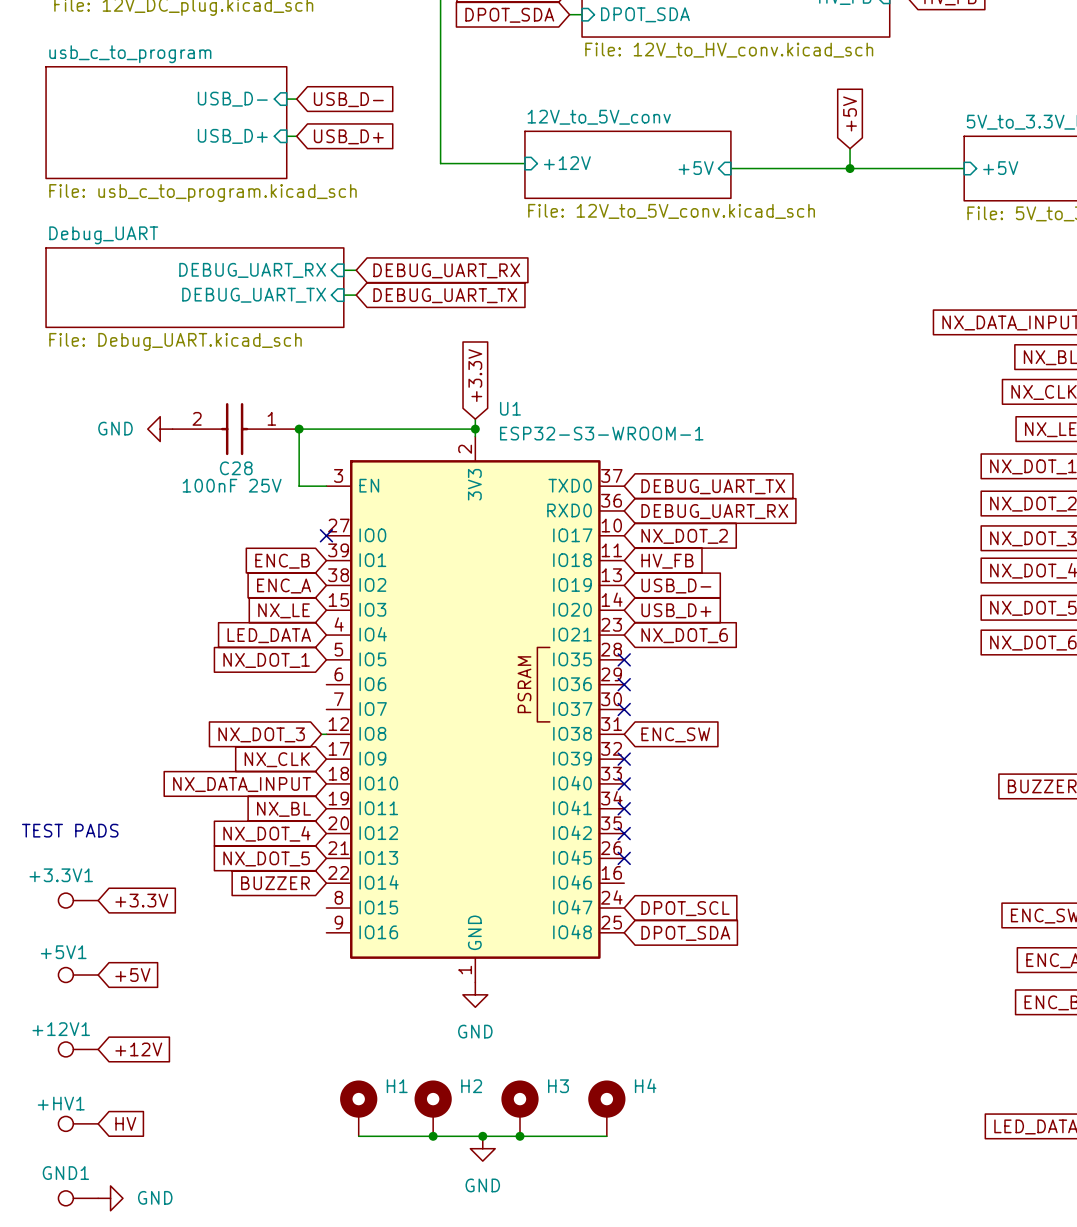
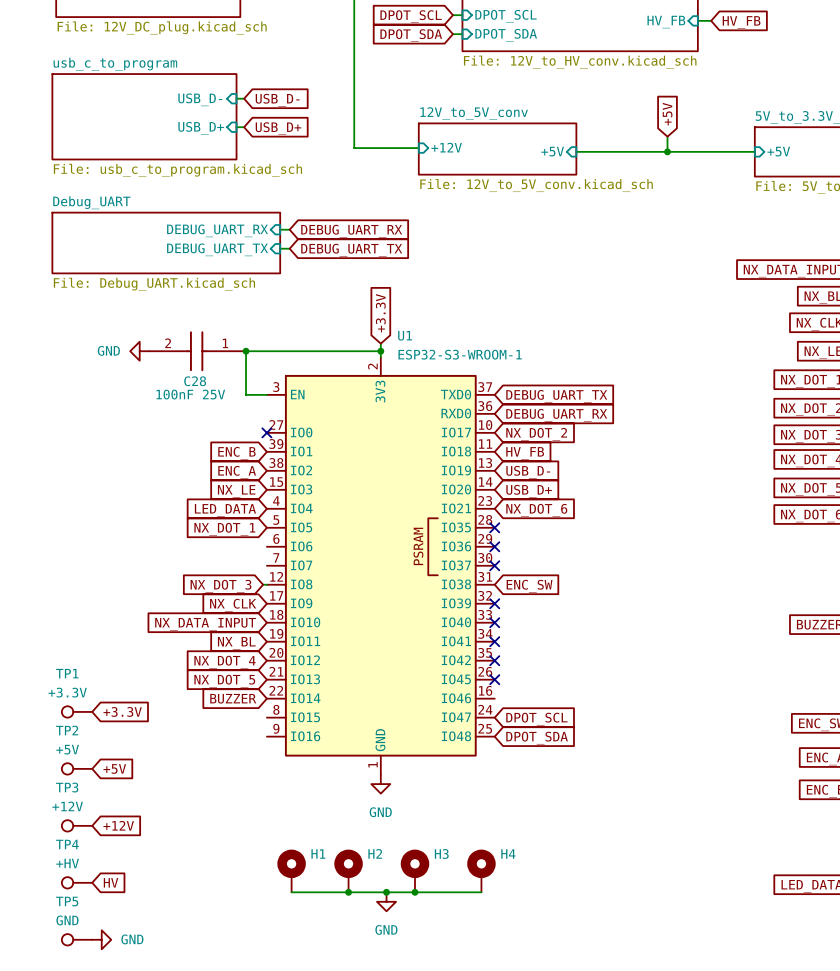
text: TEST PADS (70, 830) -> none
+3.3V1 name: +3.3V1 (61, 875) -> TP1 (67, 673)
+3.3V1 value: none -> +3.3V (67, 692)
+5V1 value: none -> +5V (67, 749)
+5V1 name: +5V1 (63, 952) -> TP2 (67, 730)
+12V1 value: none -> +12V (67, 806)
+12V1 name: +12V1 (61, 1029) -> TP3 (67, 787)
+HV1 value: none -> +HV (67, 863)
+HV1 name: +HV1 (61, 1103) -> TP4 (67, 844)
GND1 name: GND1 (65, 1173) -> TP5 (67, 901)
GND1 value: none -> GND (67, 920)

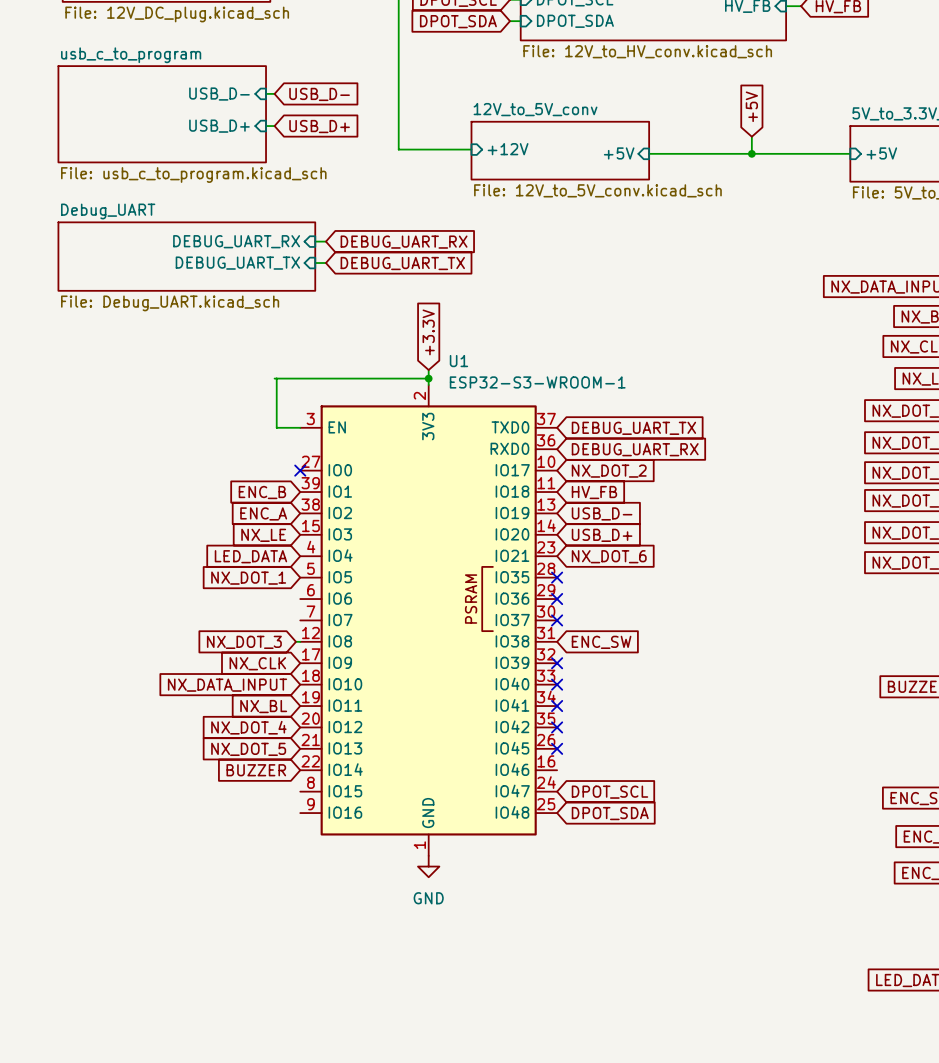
power symbol: GND (139, 351) -> none
C28: 100nF 25V (196, 351) -> none
junction: (246, 351) -> none
TP1: +3.3V (77, 711) -> none
global label: +3.3V (122, 711) -> none
TP2: +5V (77, 768) -> none
global label: +5V (114, 769) -> none
TP3: +12V (77, 825) -> none
global label: +12V (118, 825) -> none
H1: (291, 870) -> none
H2: (348, 870) -> none
H3: (414, 870) -> none
H4: (481, 870) -> none
TP4: +HV (77, 882) -> none
global label: HV (111, 882) -> none
wire: (291, 892) (481, 892) -> none
junction: (348, 892) -> none
junction: (386, 892) -> none
junction: (414, 892) -> none
power symbol: GND (386, 901) -> none
TP5: GND (77, 939) -> none
power symbol: GND (101, 939) -> none

